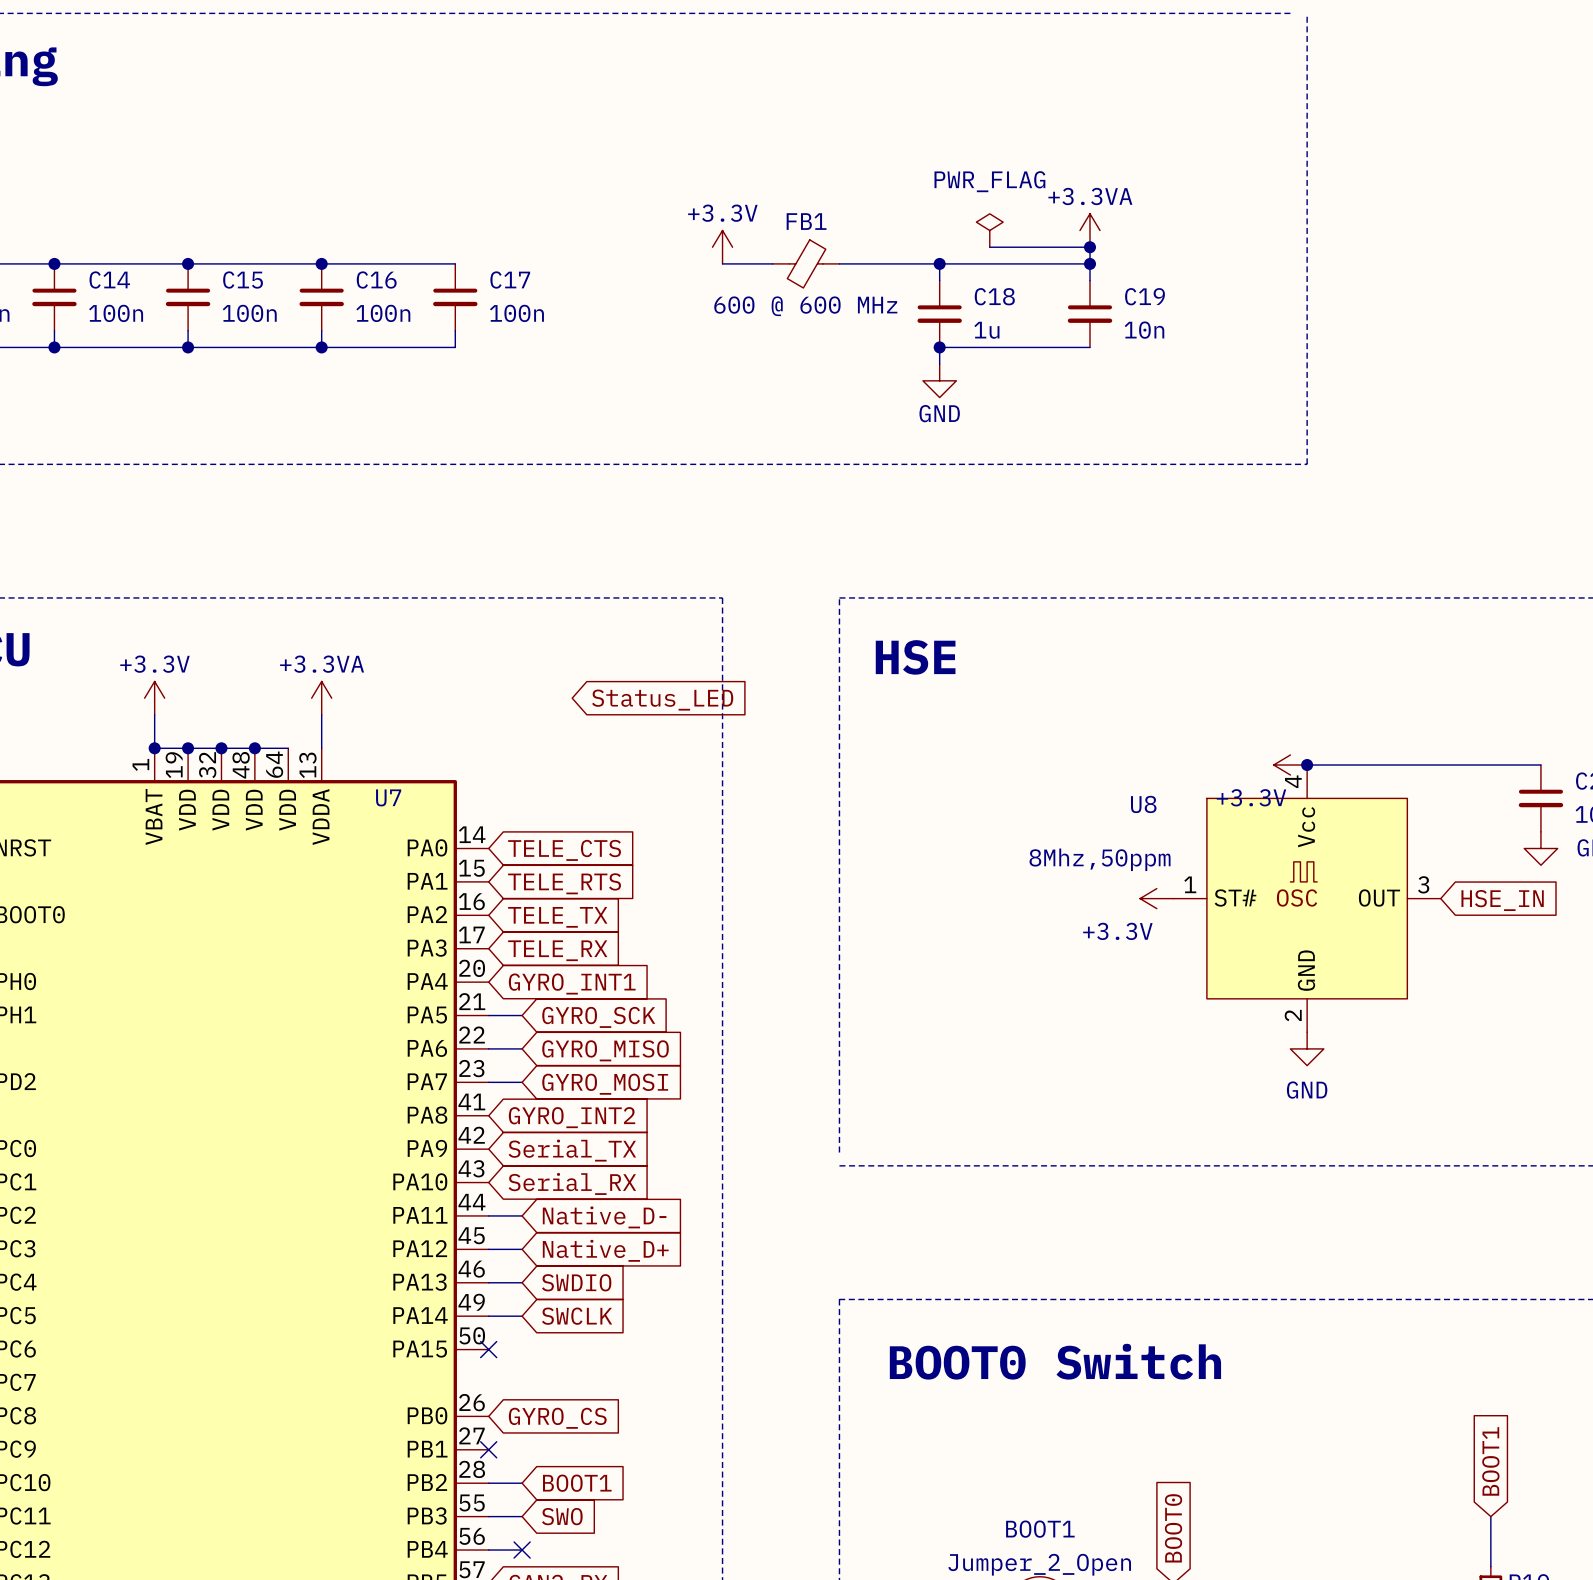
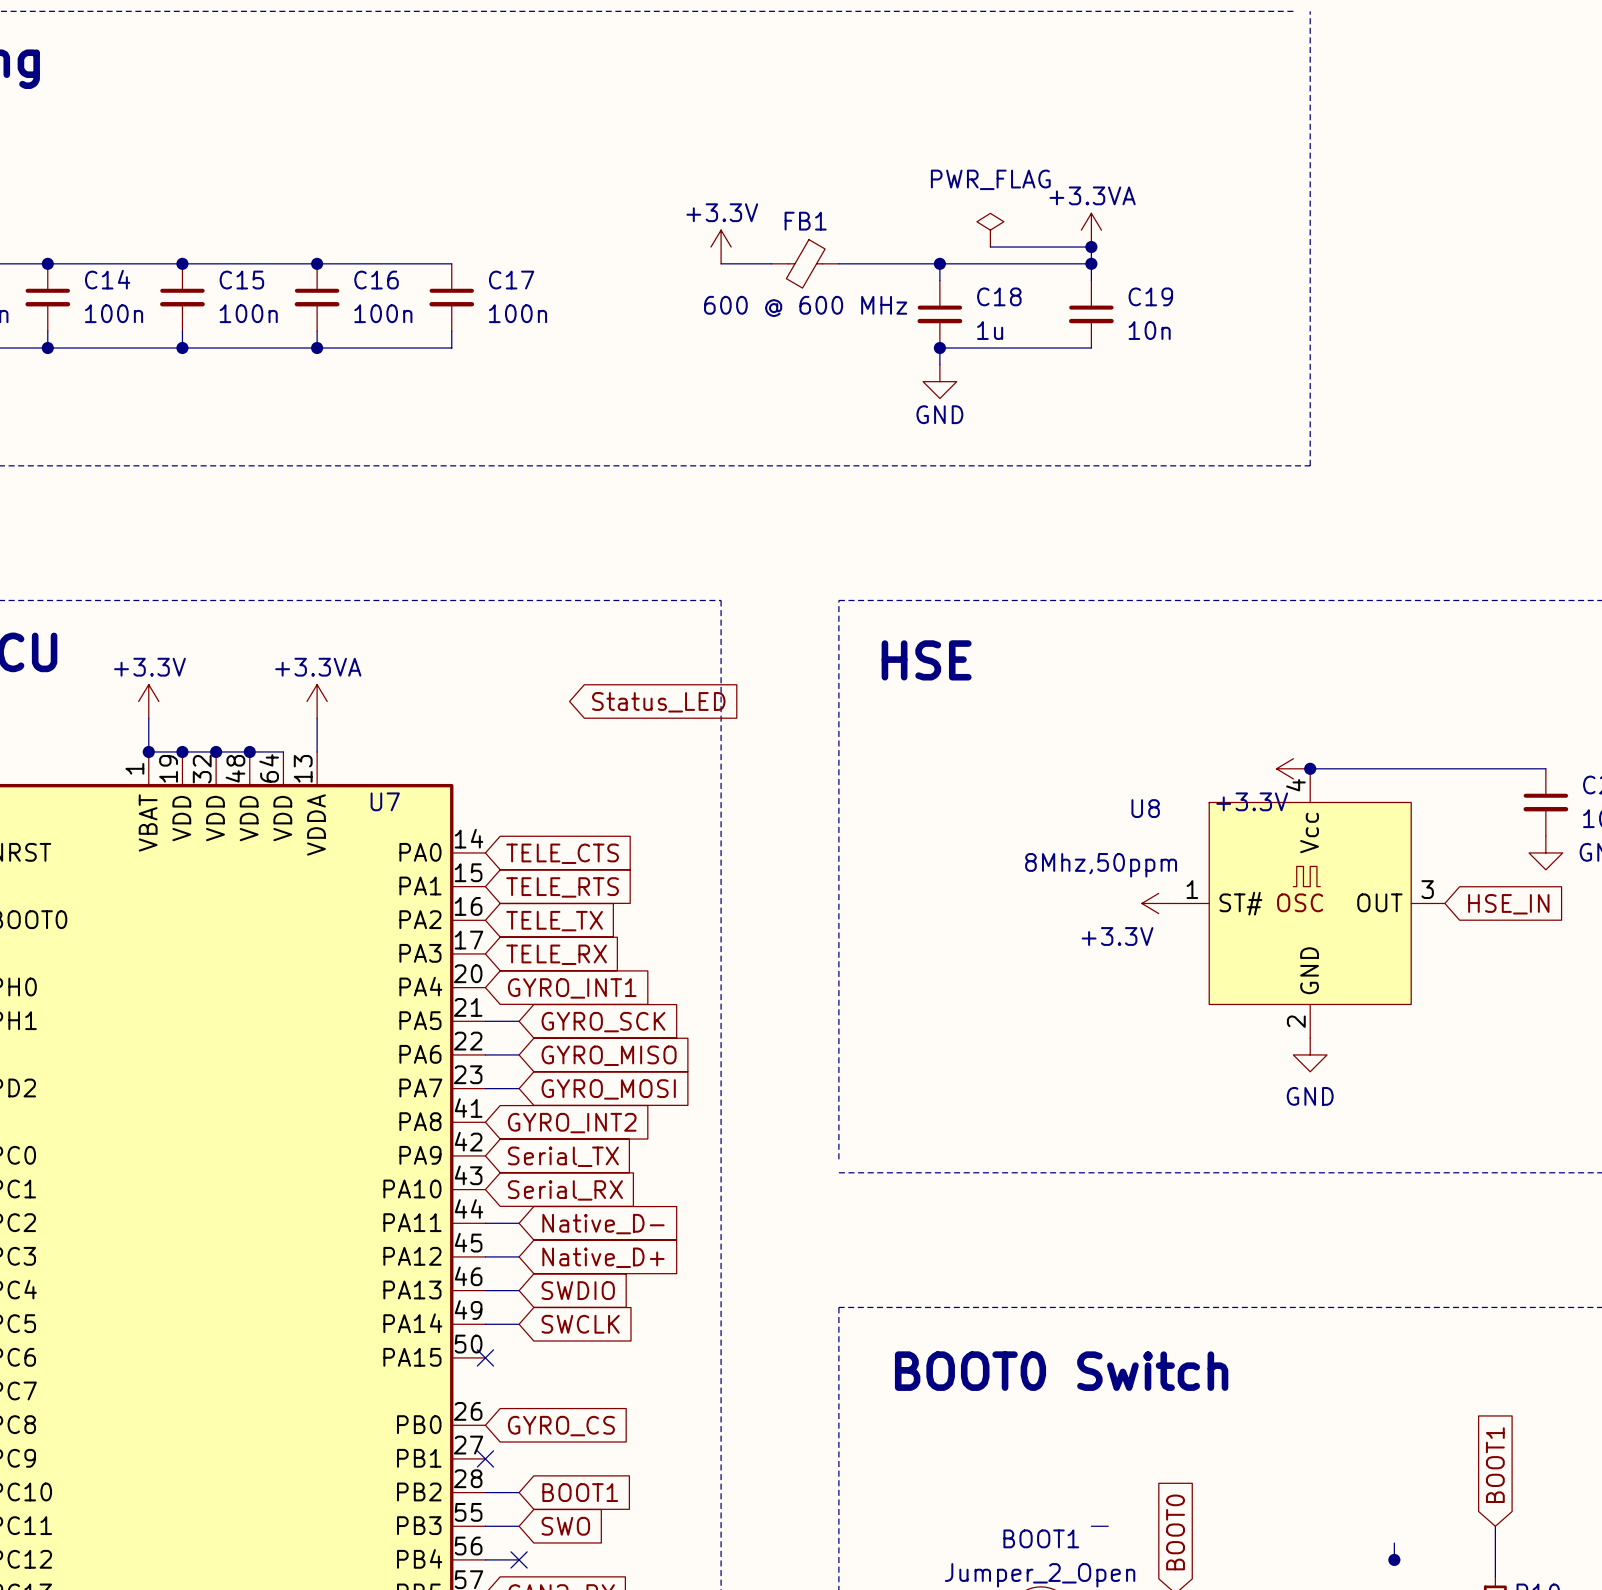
wire: none -> (1091, 1526) (1108, 1526)
wire: none -> (1394, 1543) (1394, 1559)
junction: none -> (1394, 1559)

